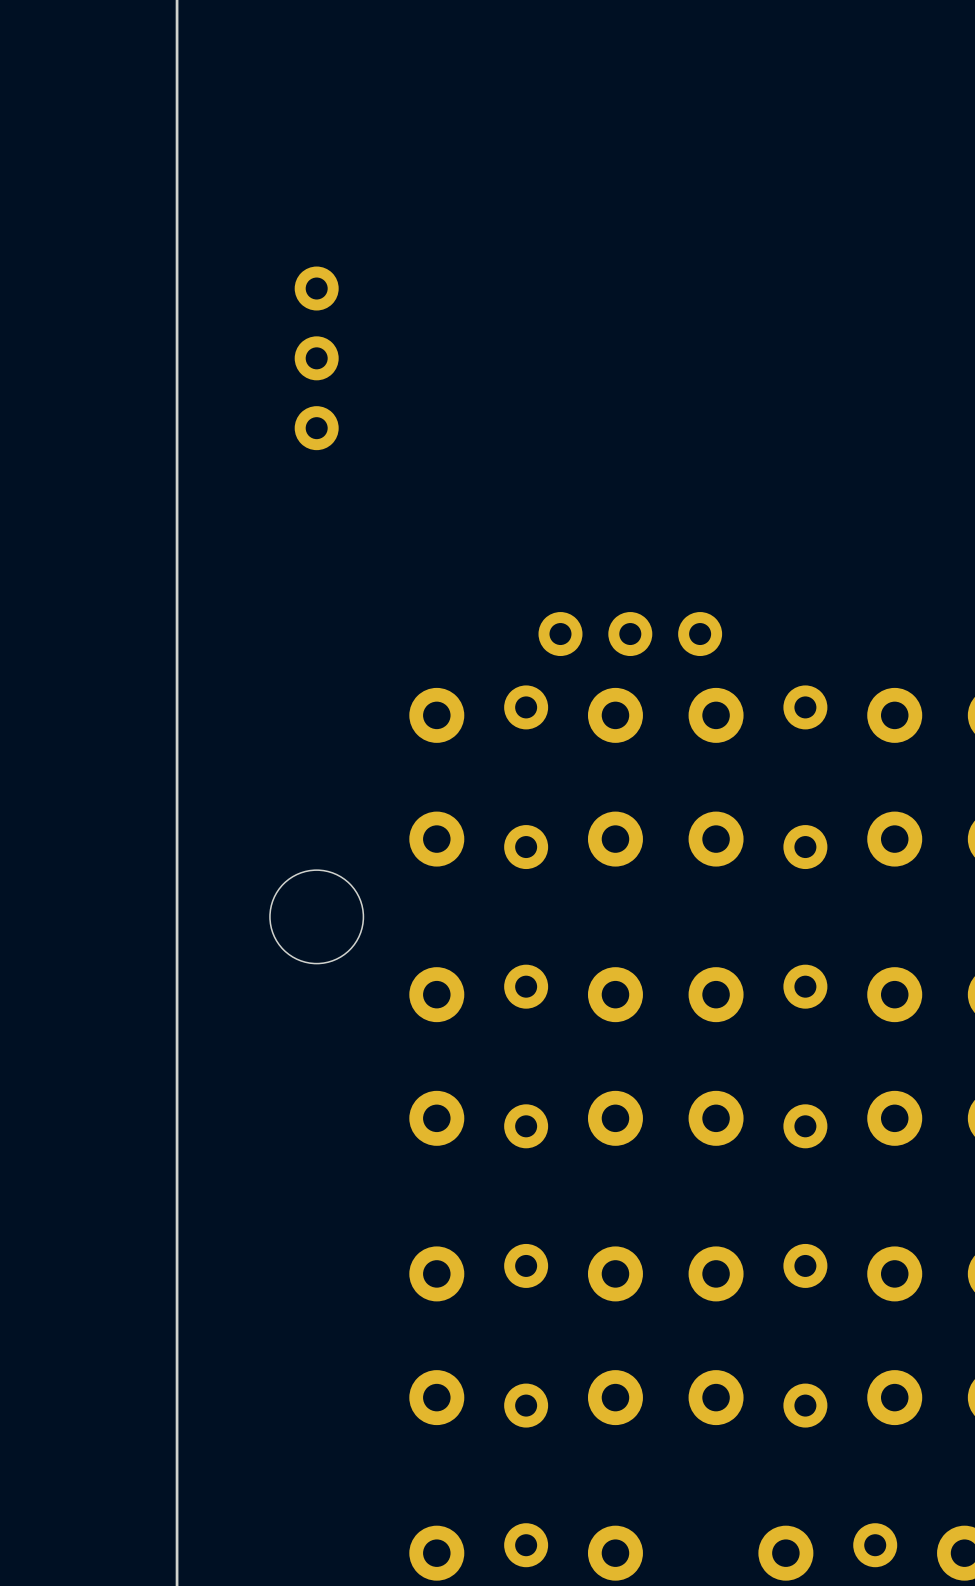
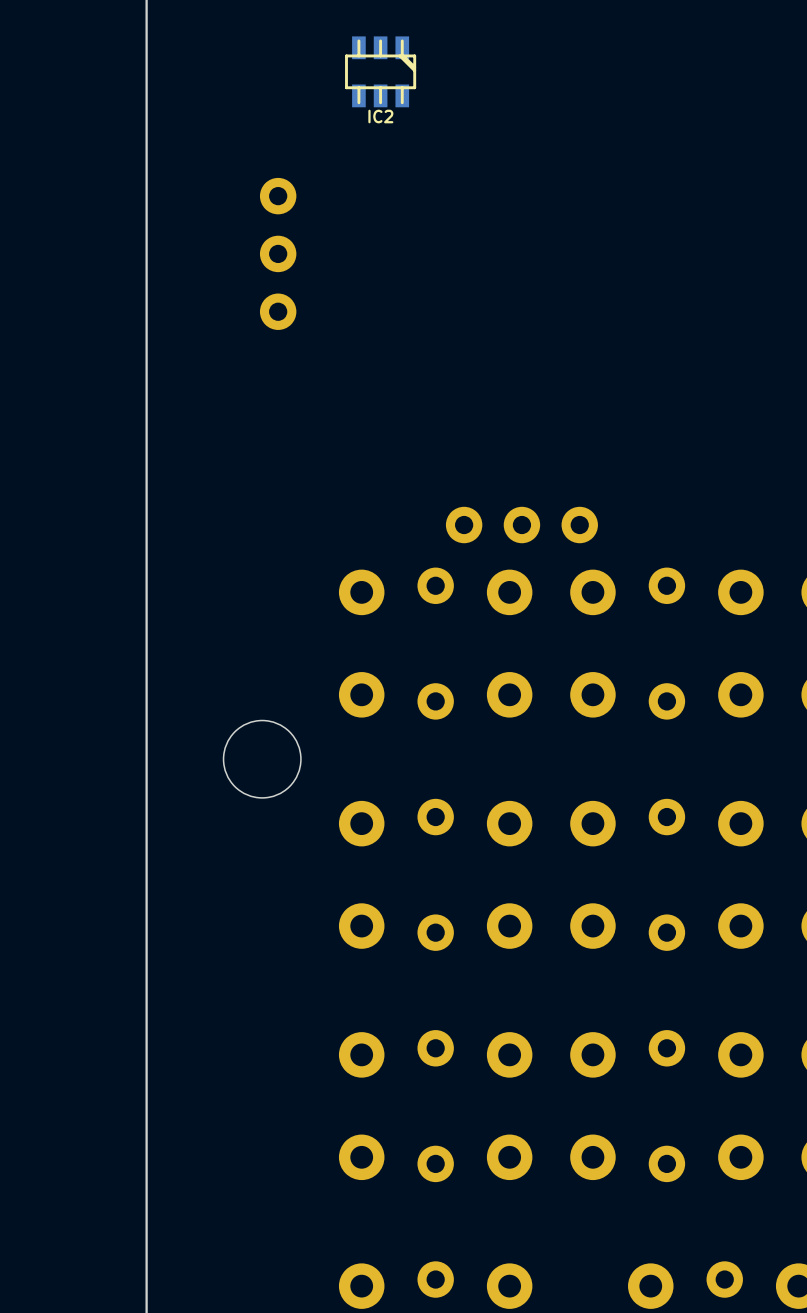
IC2: none -> (380, 71)
part position: (316, 358) -> (278, 253)

